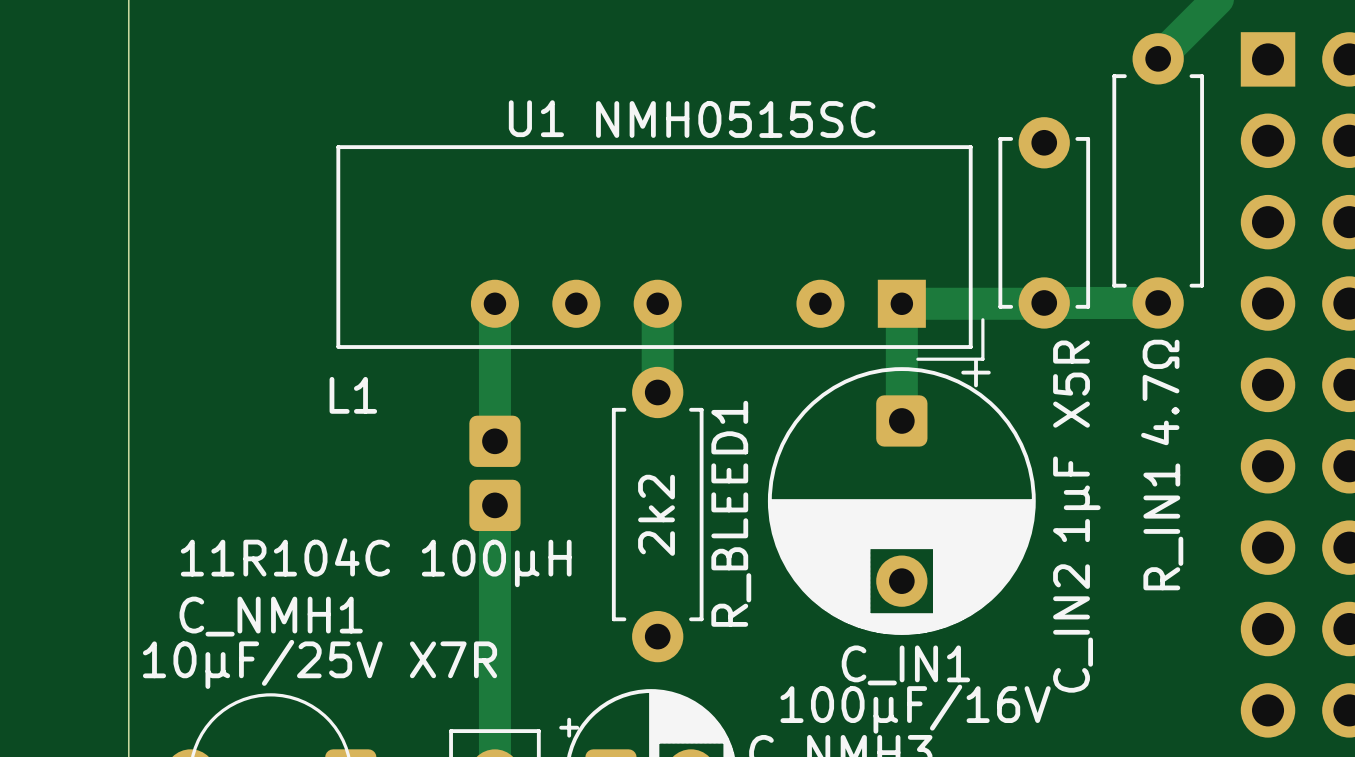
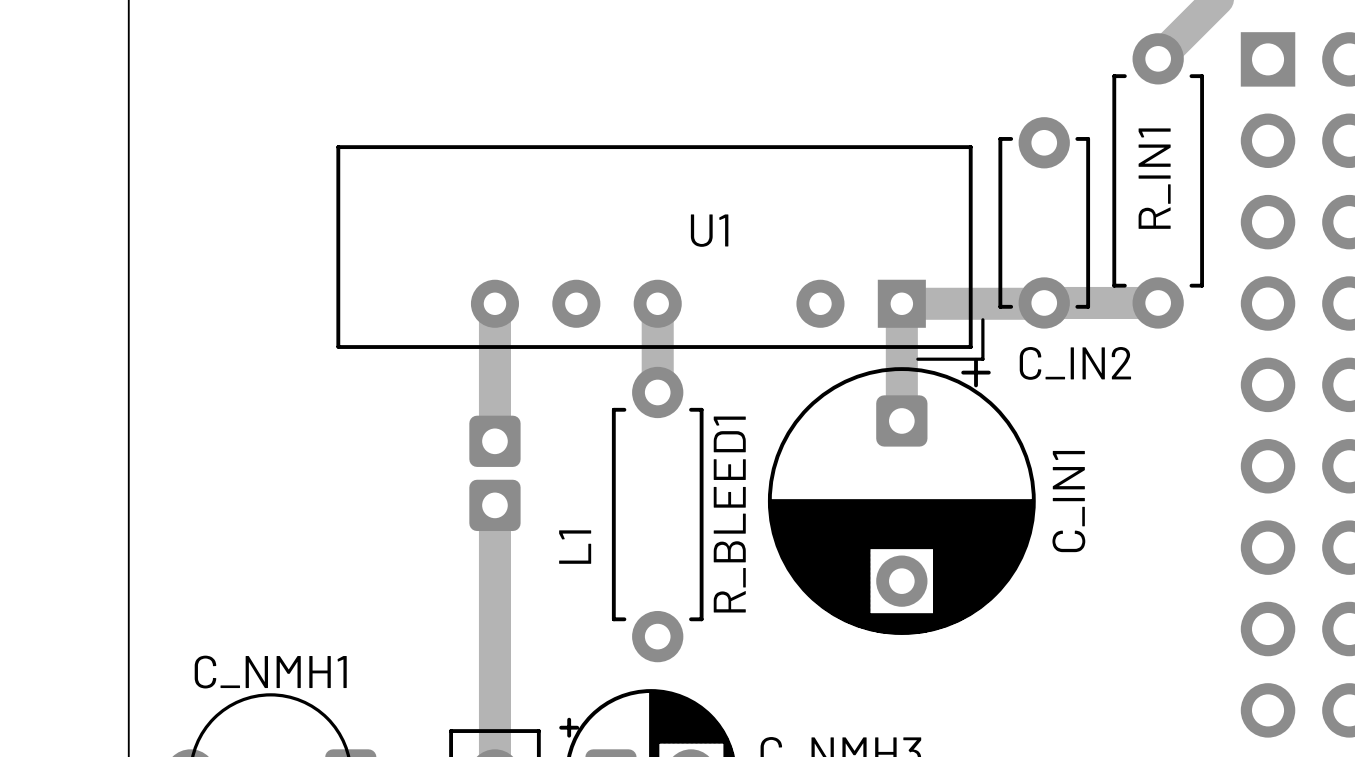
U1 name position: U1 (536, 118) -> U1 (709, 230)
U1 value: NMH0515SC (735, 119) -> none
R_IN1 value: 4.7Ω (1160, 392) -> none
L1 name rotation: 0° (353, 395) -> 90° counterclockwise (575, 547)
L1 name position: L1 (353, 395) -> L1 (575, 547)
C_IN2 value: 1µF X5R (1076, 441) -> none
R_BLEED1 value: 2k2 (656, 515) -> none
R_IN1 name position: R_IN1 (1163, 526) -> R_IN1 (1154, 178)
L1 value: 11R104C 100µH (376, 562) -> none
C_NMH1 name position: C_NMH1 (271, 616) -> C_NMH1 (270, 672)
C_IN2 name rotation: 0° (1073, 628) -> 90° clockwise (1075, 363)
C_IN2 name position: C_IN2 (1073, 628) -> C_IN2 (1075, 363)
C_NMH1 value: 10µF/25V X7R (320, 664) -> none
C_IN1 name rotation: 0° (905, 665) -> 90° counterclockwise (1068, 501)
C_IN1 name position: C_IN1 (905, 665) -> C_IN1 (1068, 501)
C_IN1 value: 100µF/16V (915, 709) -> none

